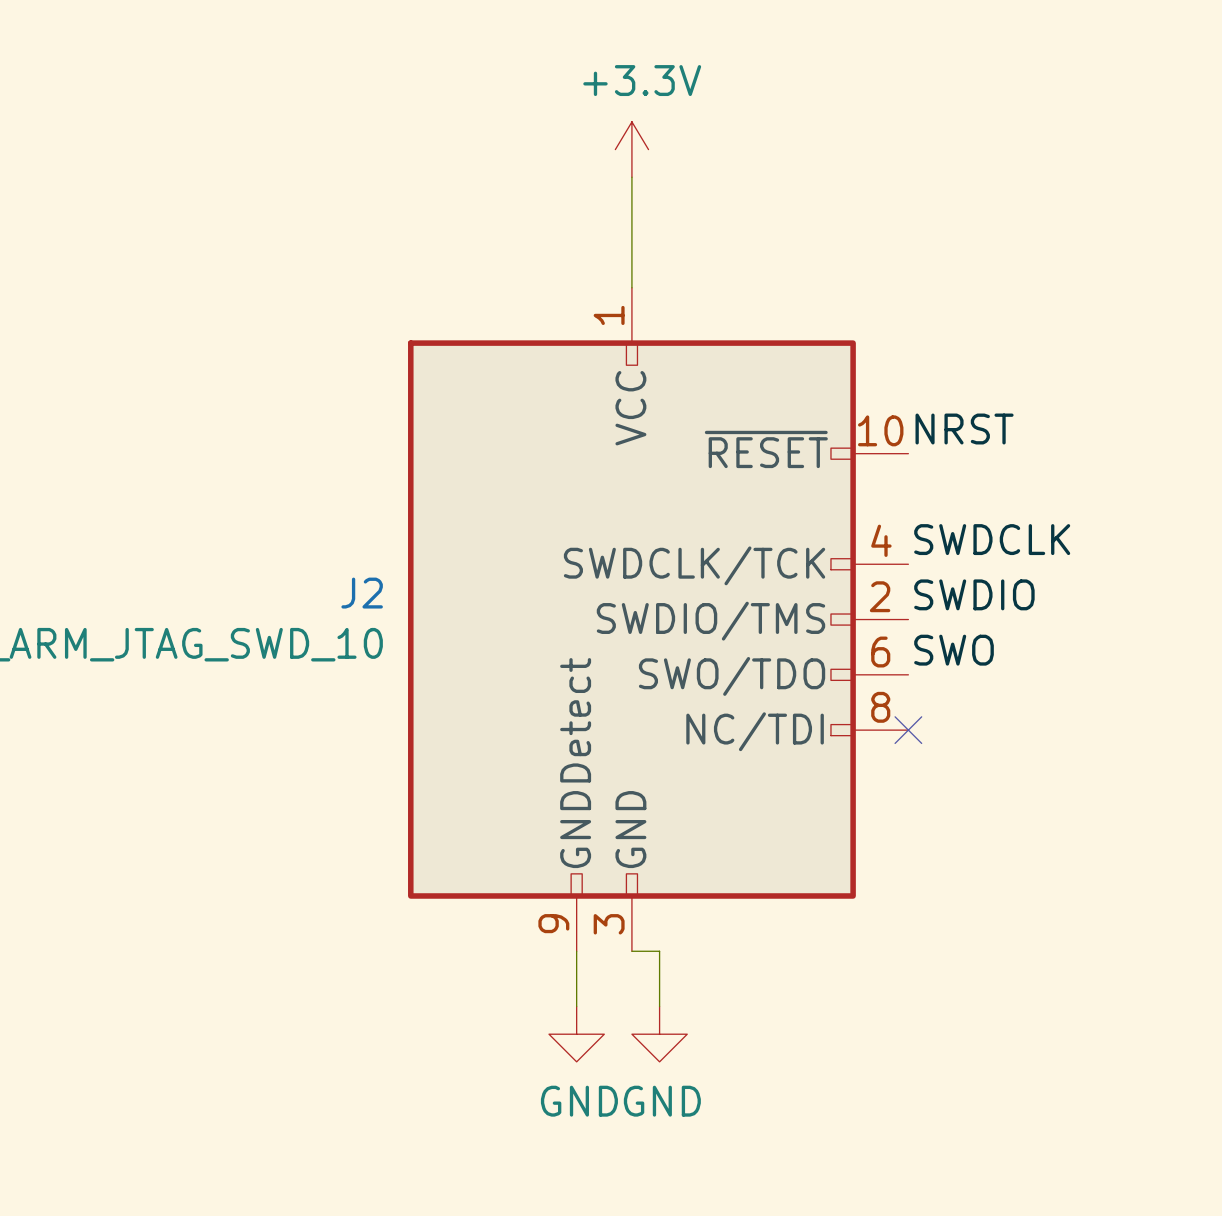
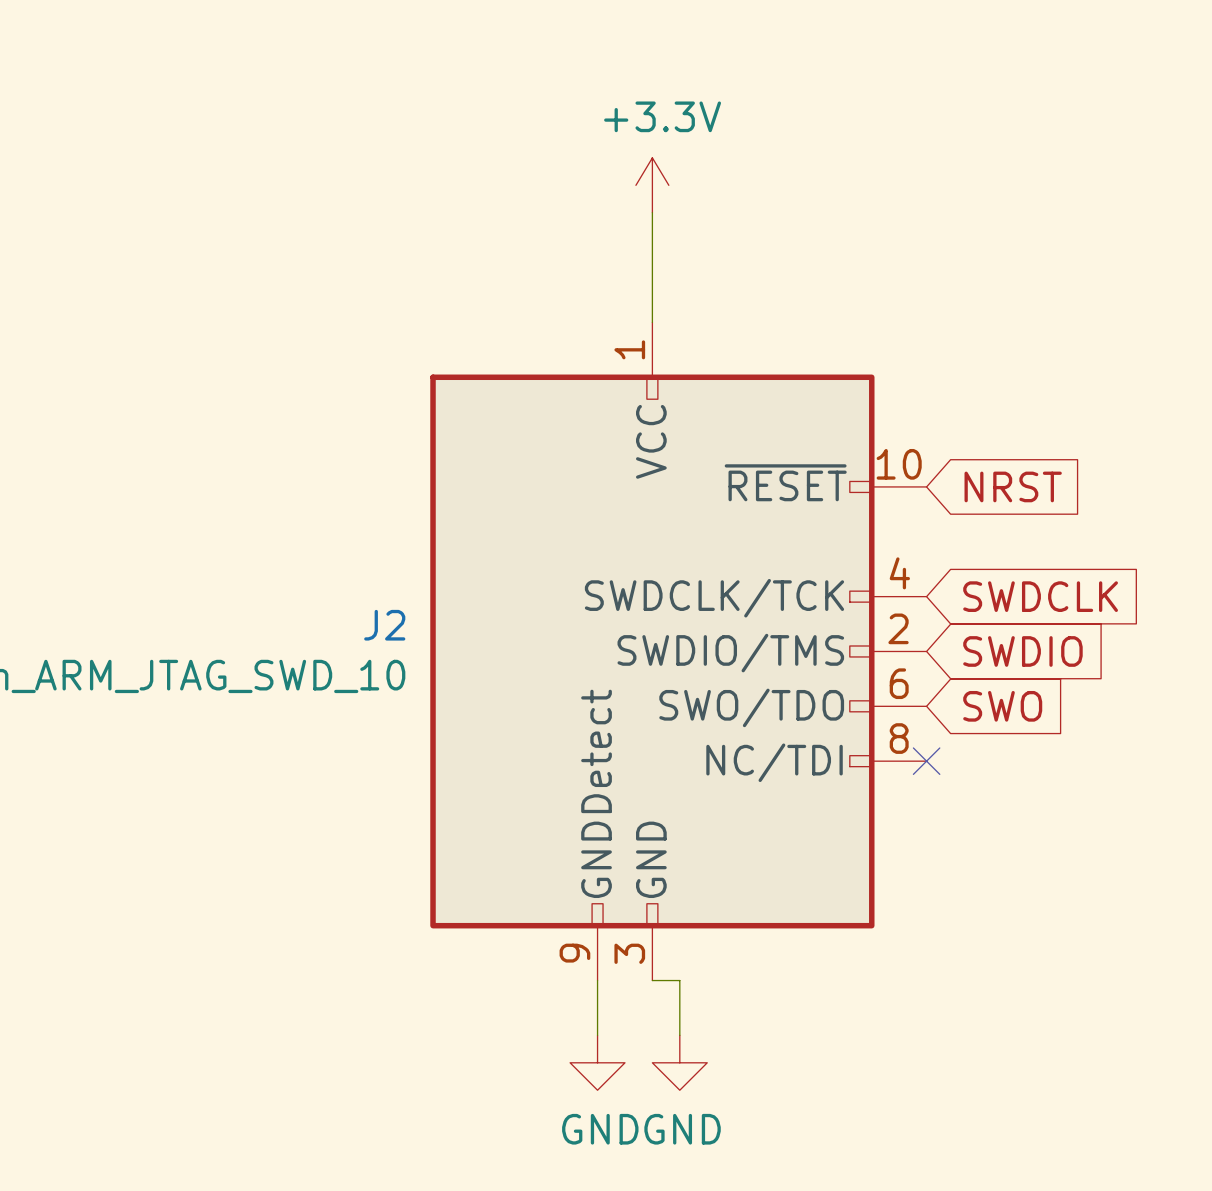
label: NRST (964, 429) -> none
global label: none -> NRST (1013, 486)
label: SWDCLK (992, 539) -> none
global label: none -> SWDCLK (1040, 596)
label: SWDIO (974, 594) -> none
global label: none -> SWDIO (1022, 651)
label: SWO (954, 650) -> none
global label: none -> SWO (1002, 706)

